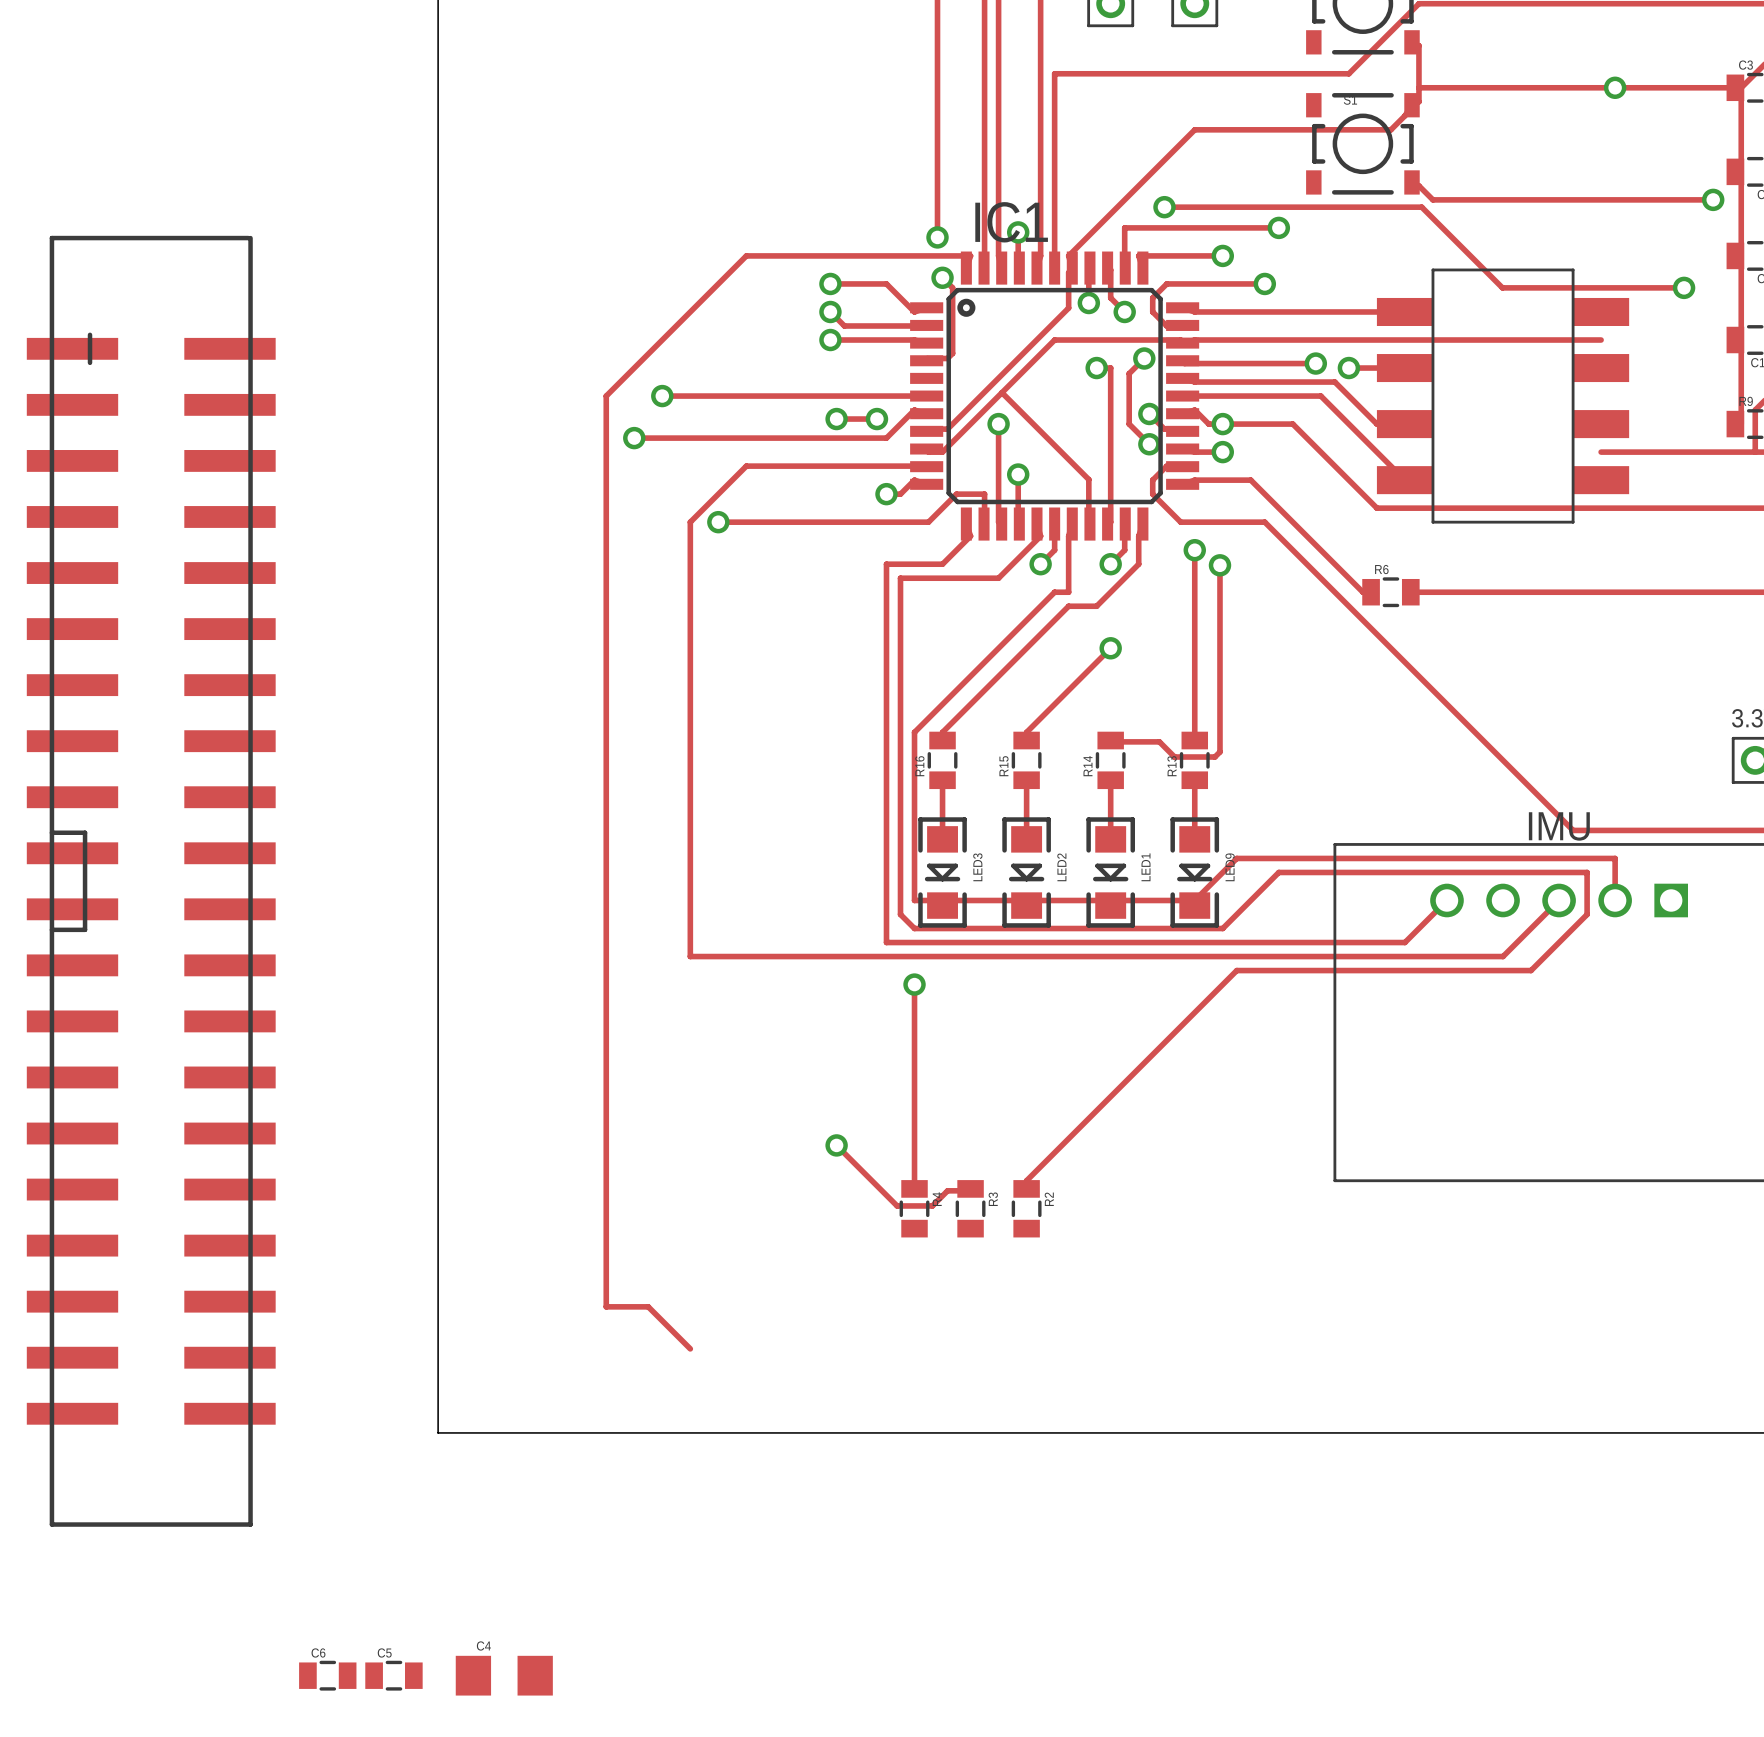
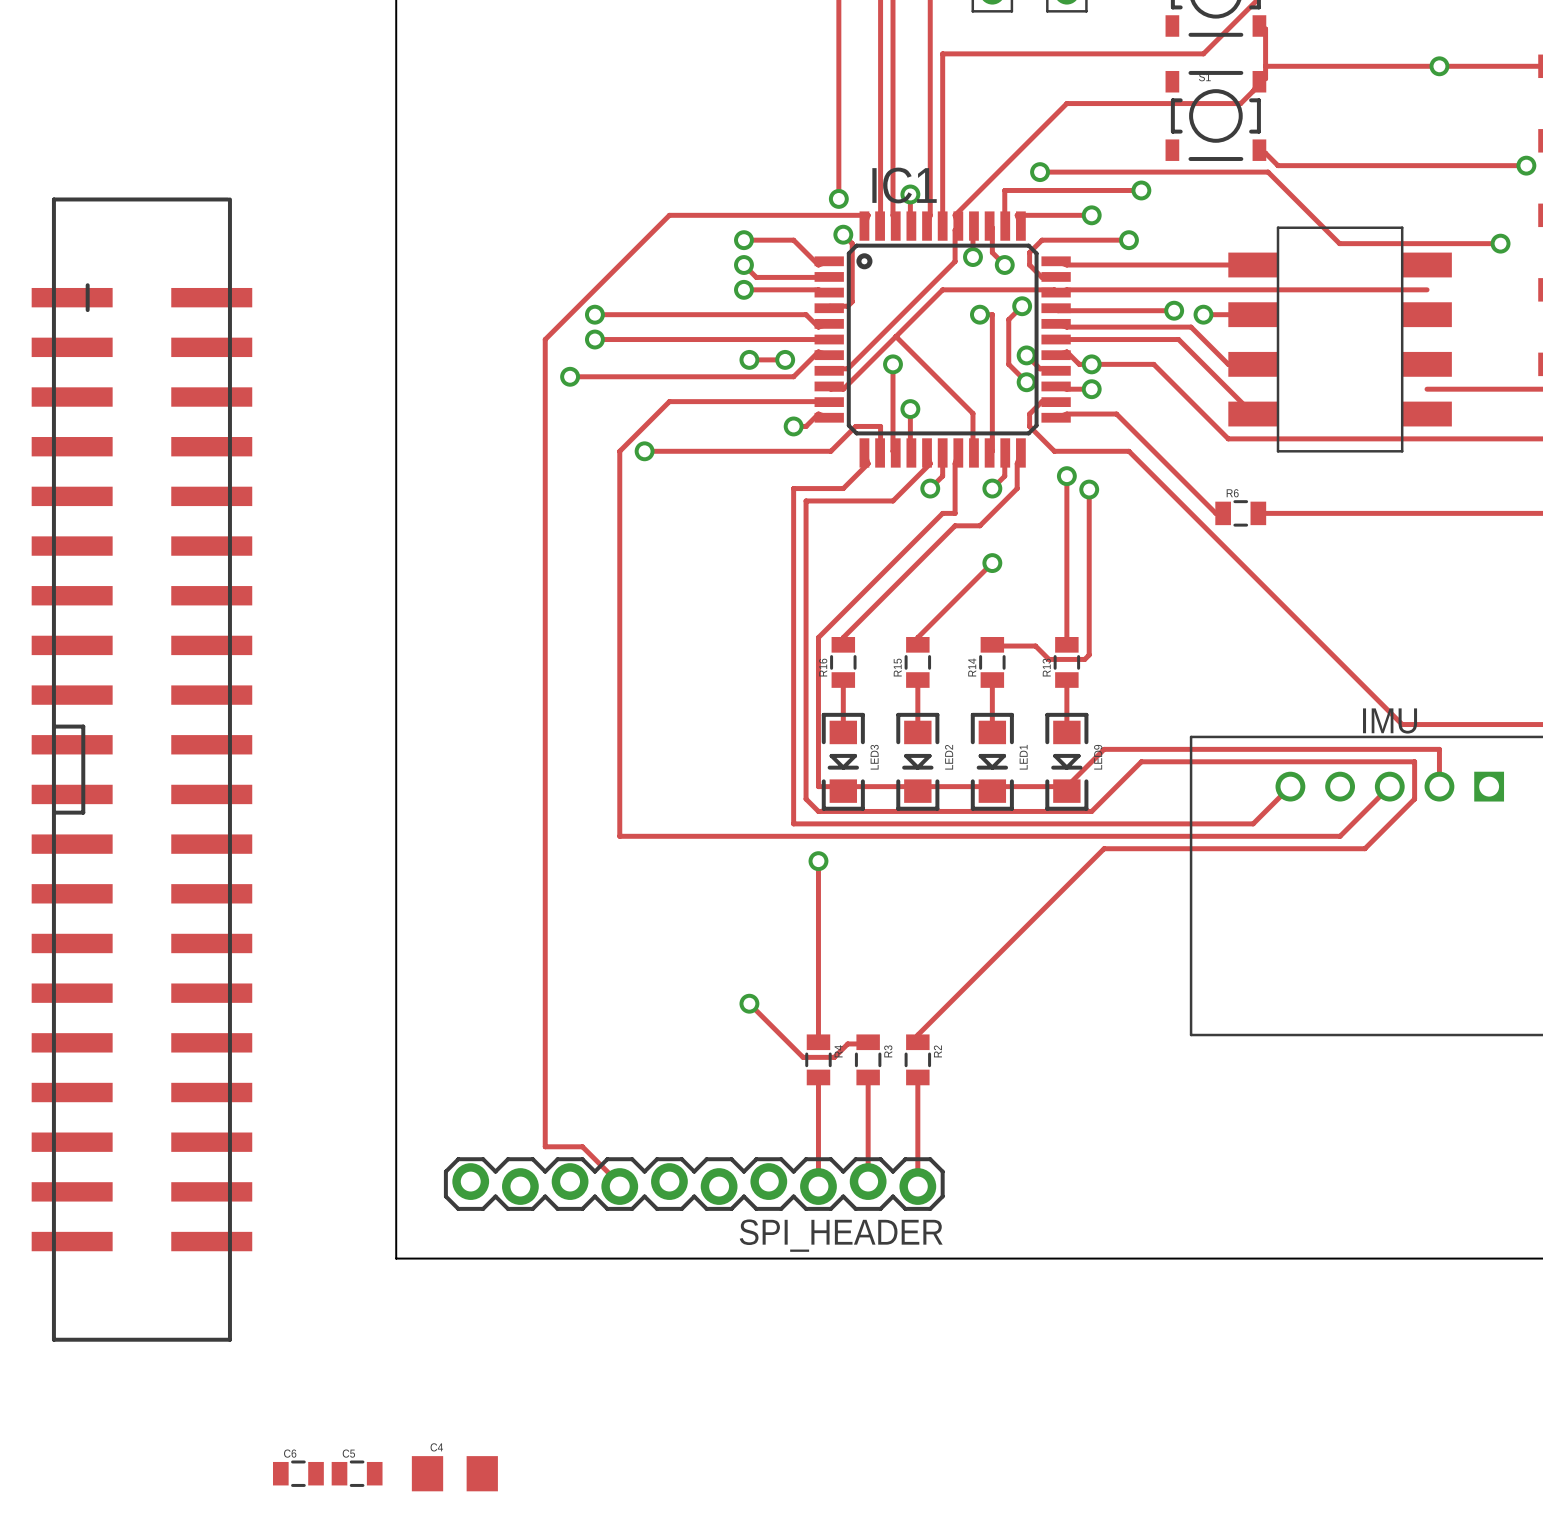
track: none -> (594, 314) (806, 314) (818, 327) (829, 323)
via: none -> (594, 314)
track: none -> (818, 1077) (818, 1186)
track: none -> (868, 1077) (868, 1181)
track: none -> (917, 1077) (917, 1186)
SPI_HEADER: none -> (694, 1184)

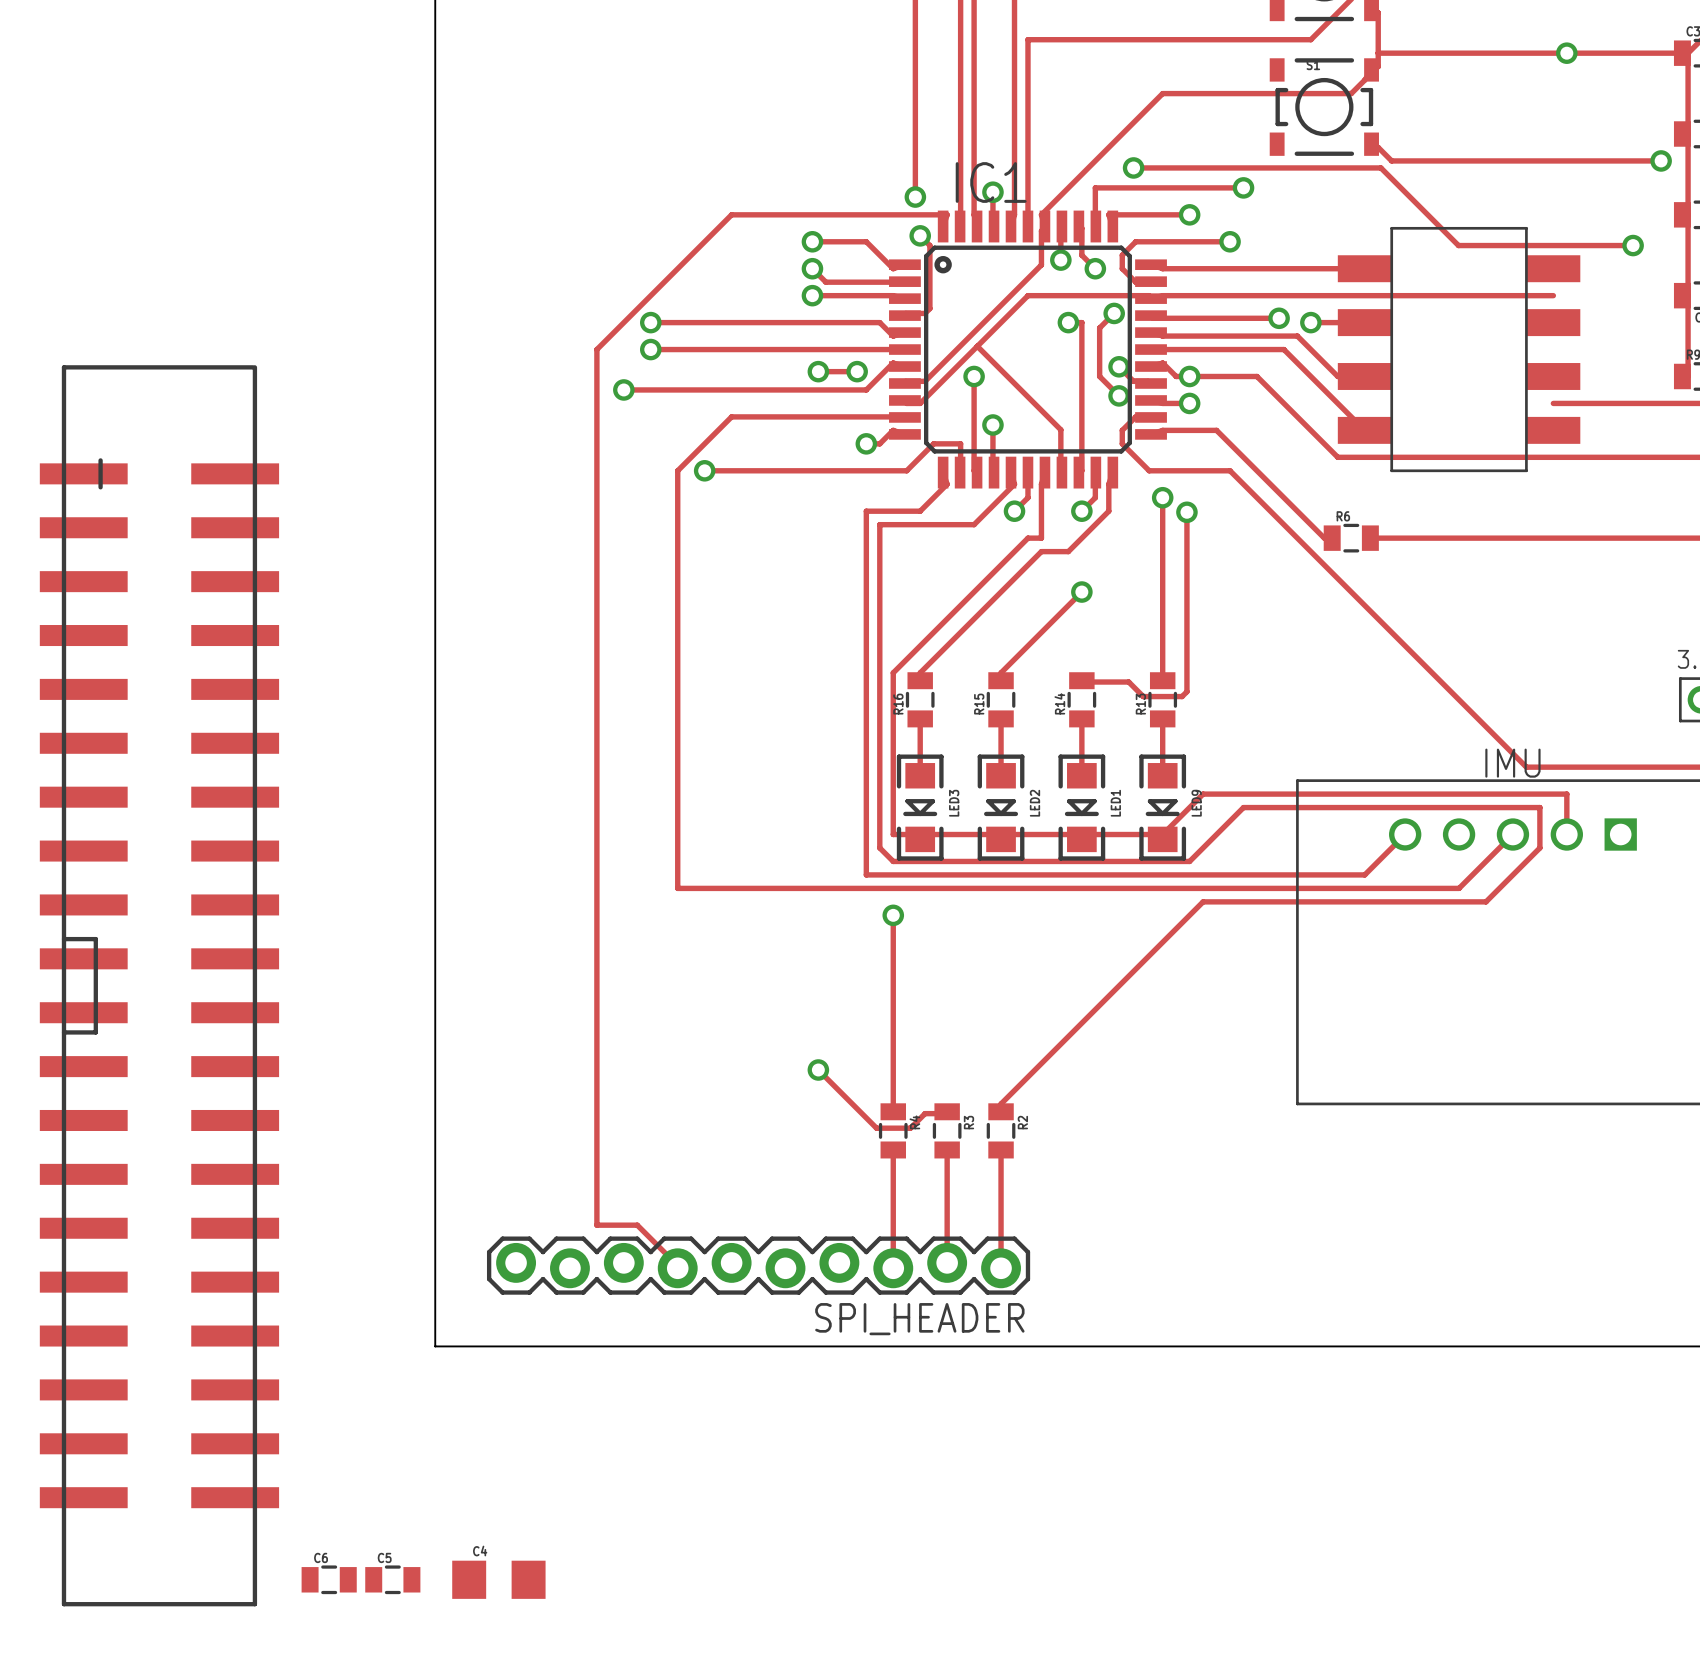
part position: (141, 769) -> (159, 985)

